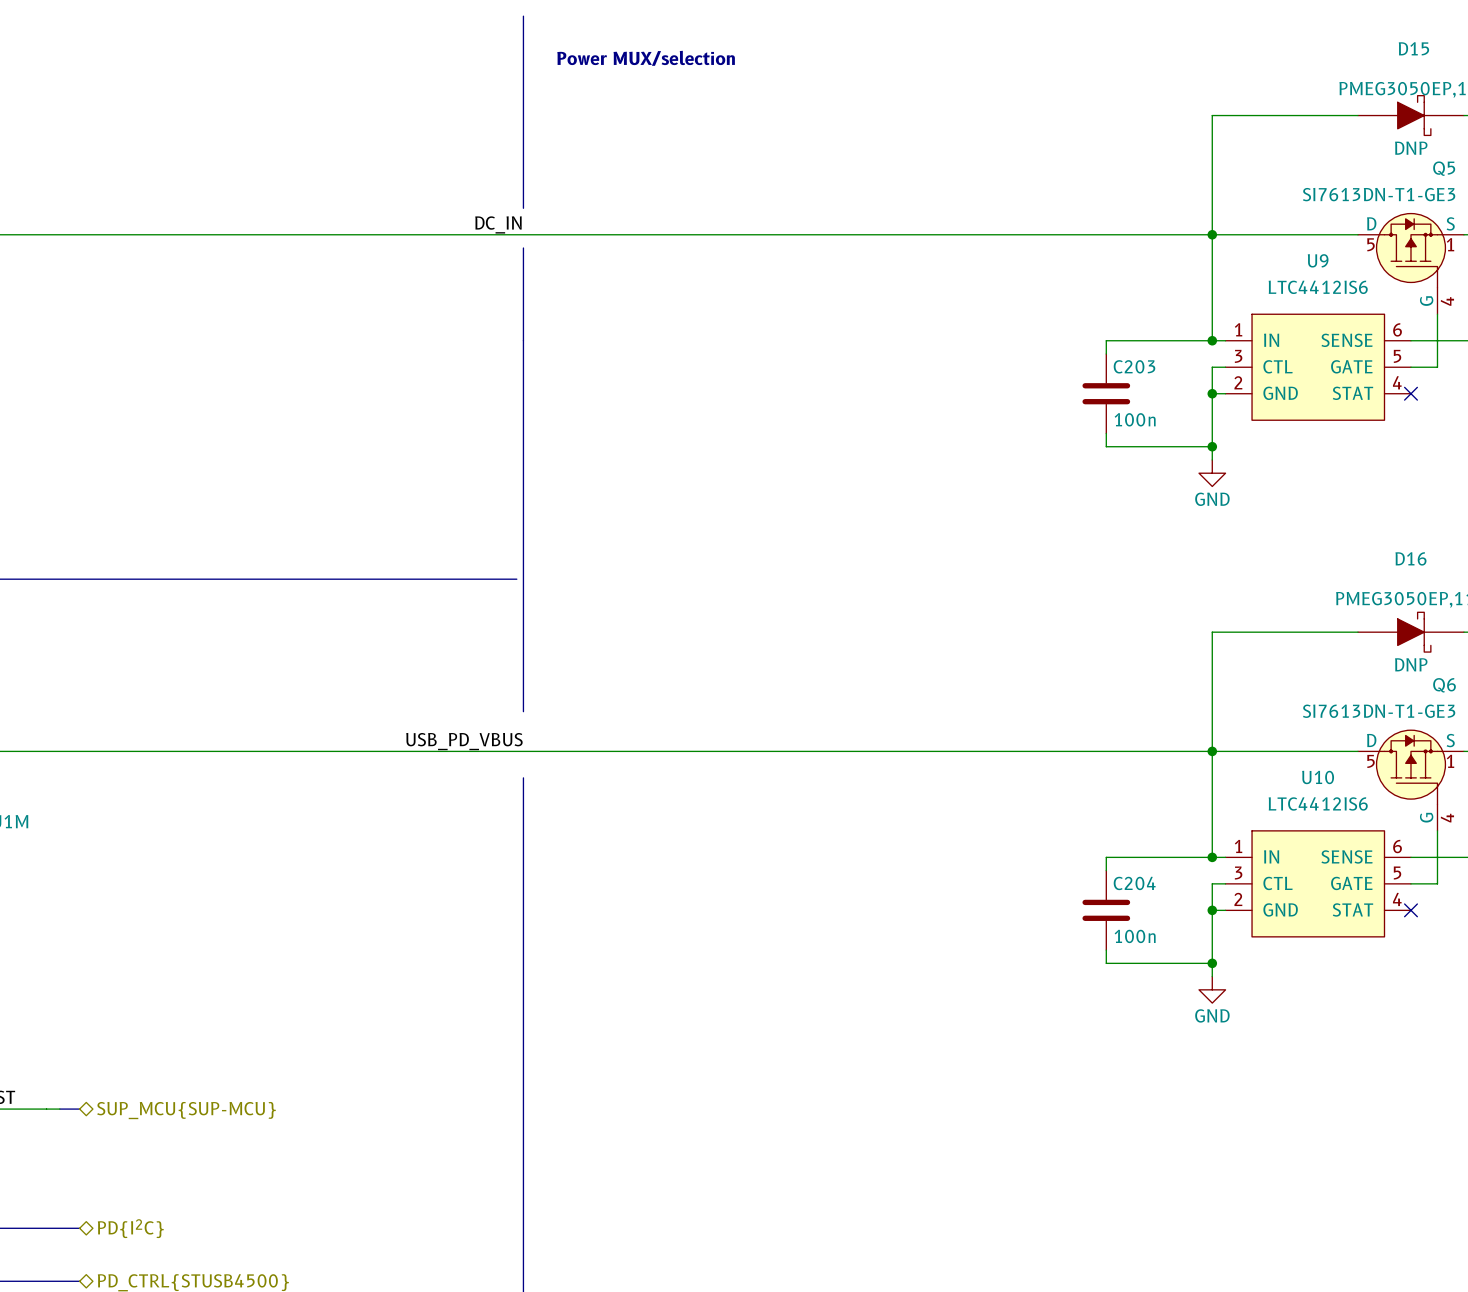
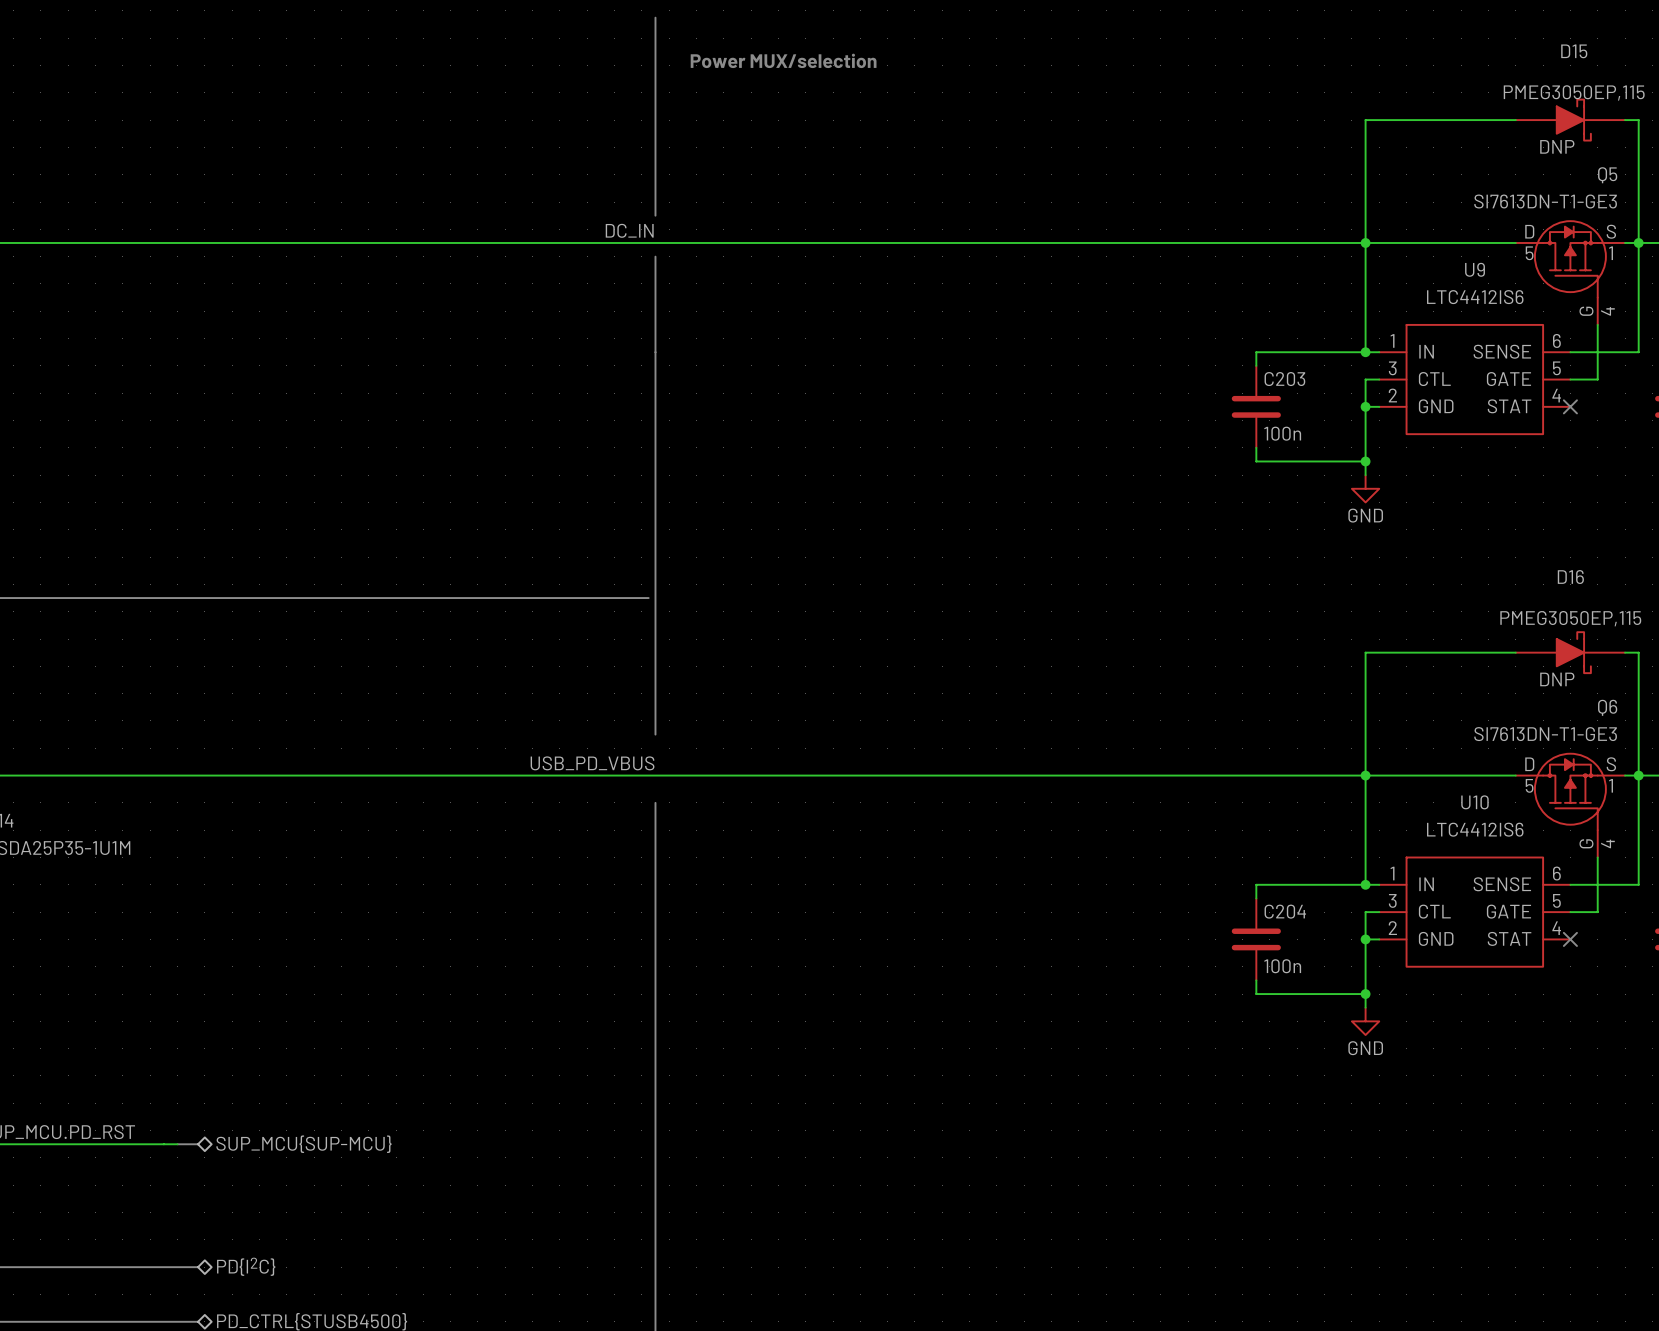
D15 text position: DNP (1411, 148) -> DNP (1557, 146)
D16 text position: DNP (1411, 664) -> DNP (1557, 679)

